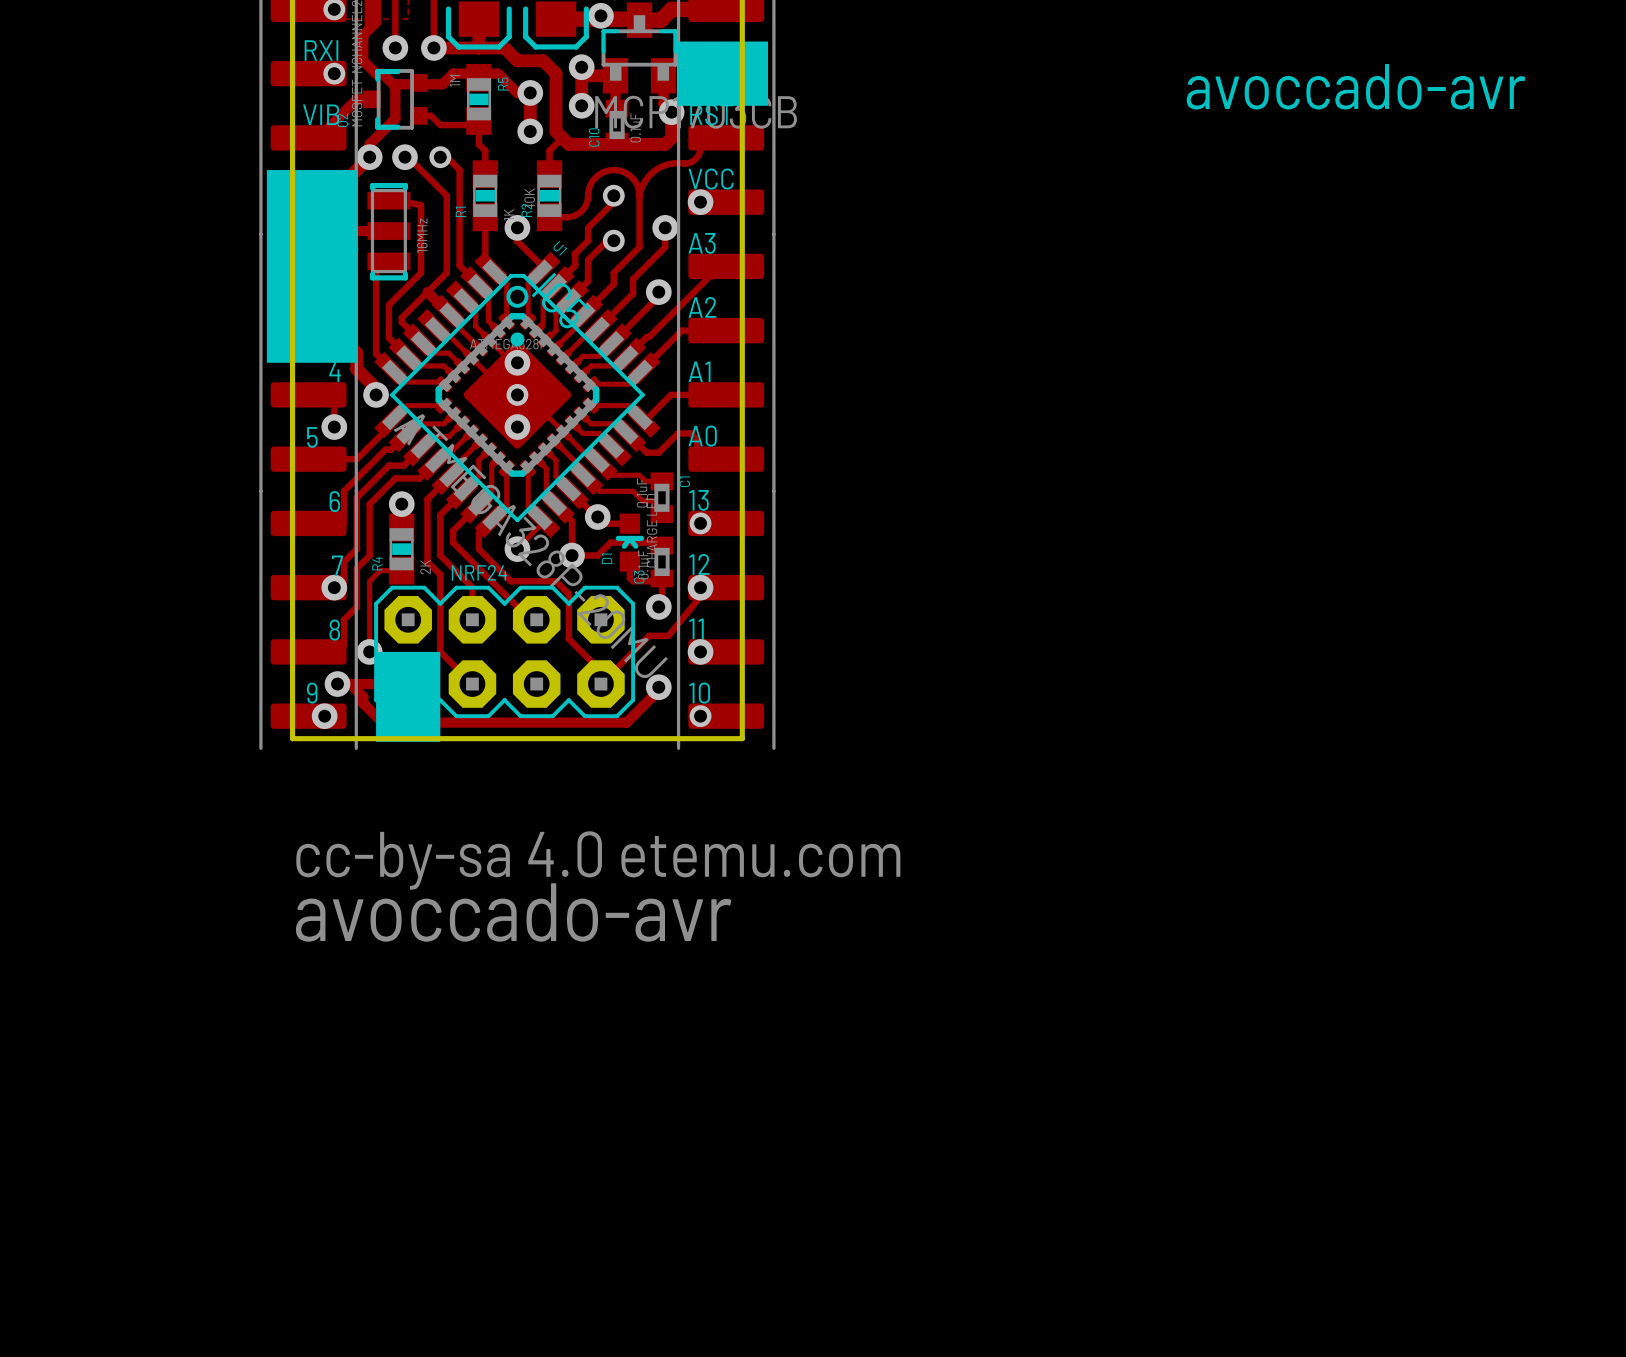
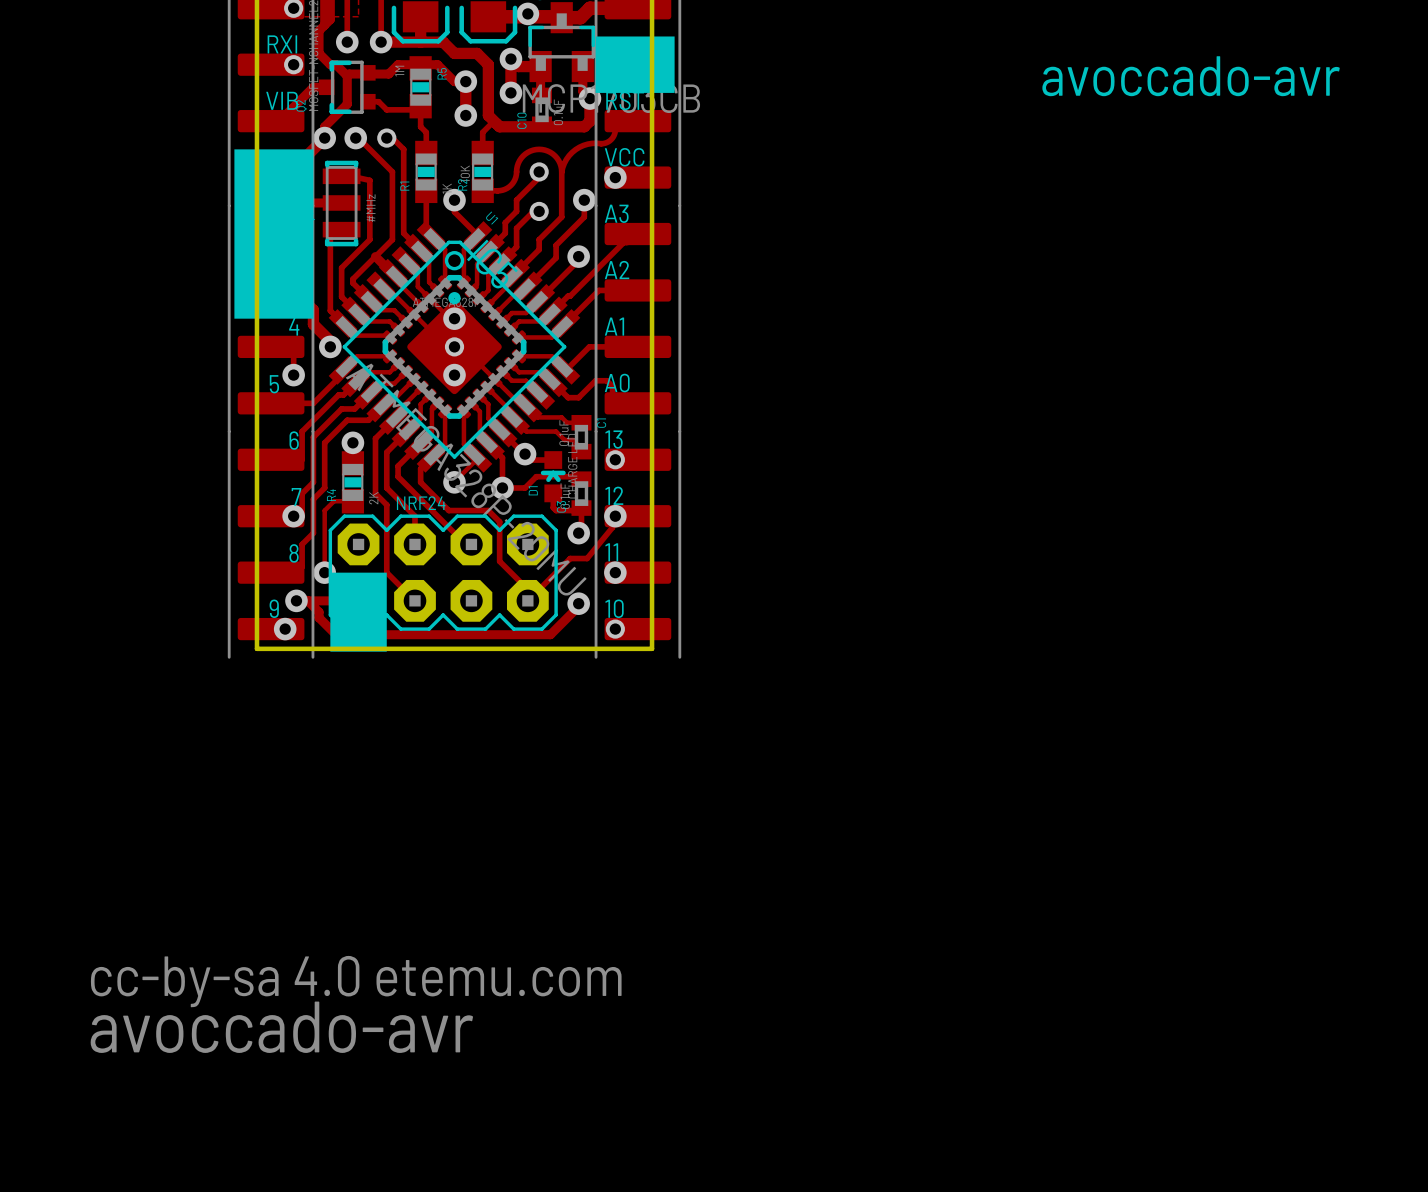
part value: 16MHz (422, 235) -> #MHz (370, 208)
text position: cc-by-sa 4.0 etemu.com (598, 860) -> cc-by-sa 4.0 etemu.com (356, 981)
text position: avoccado-avr (513, 912) -> avoccado-avr (281, 1027)

